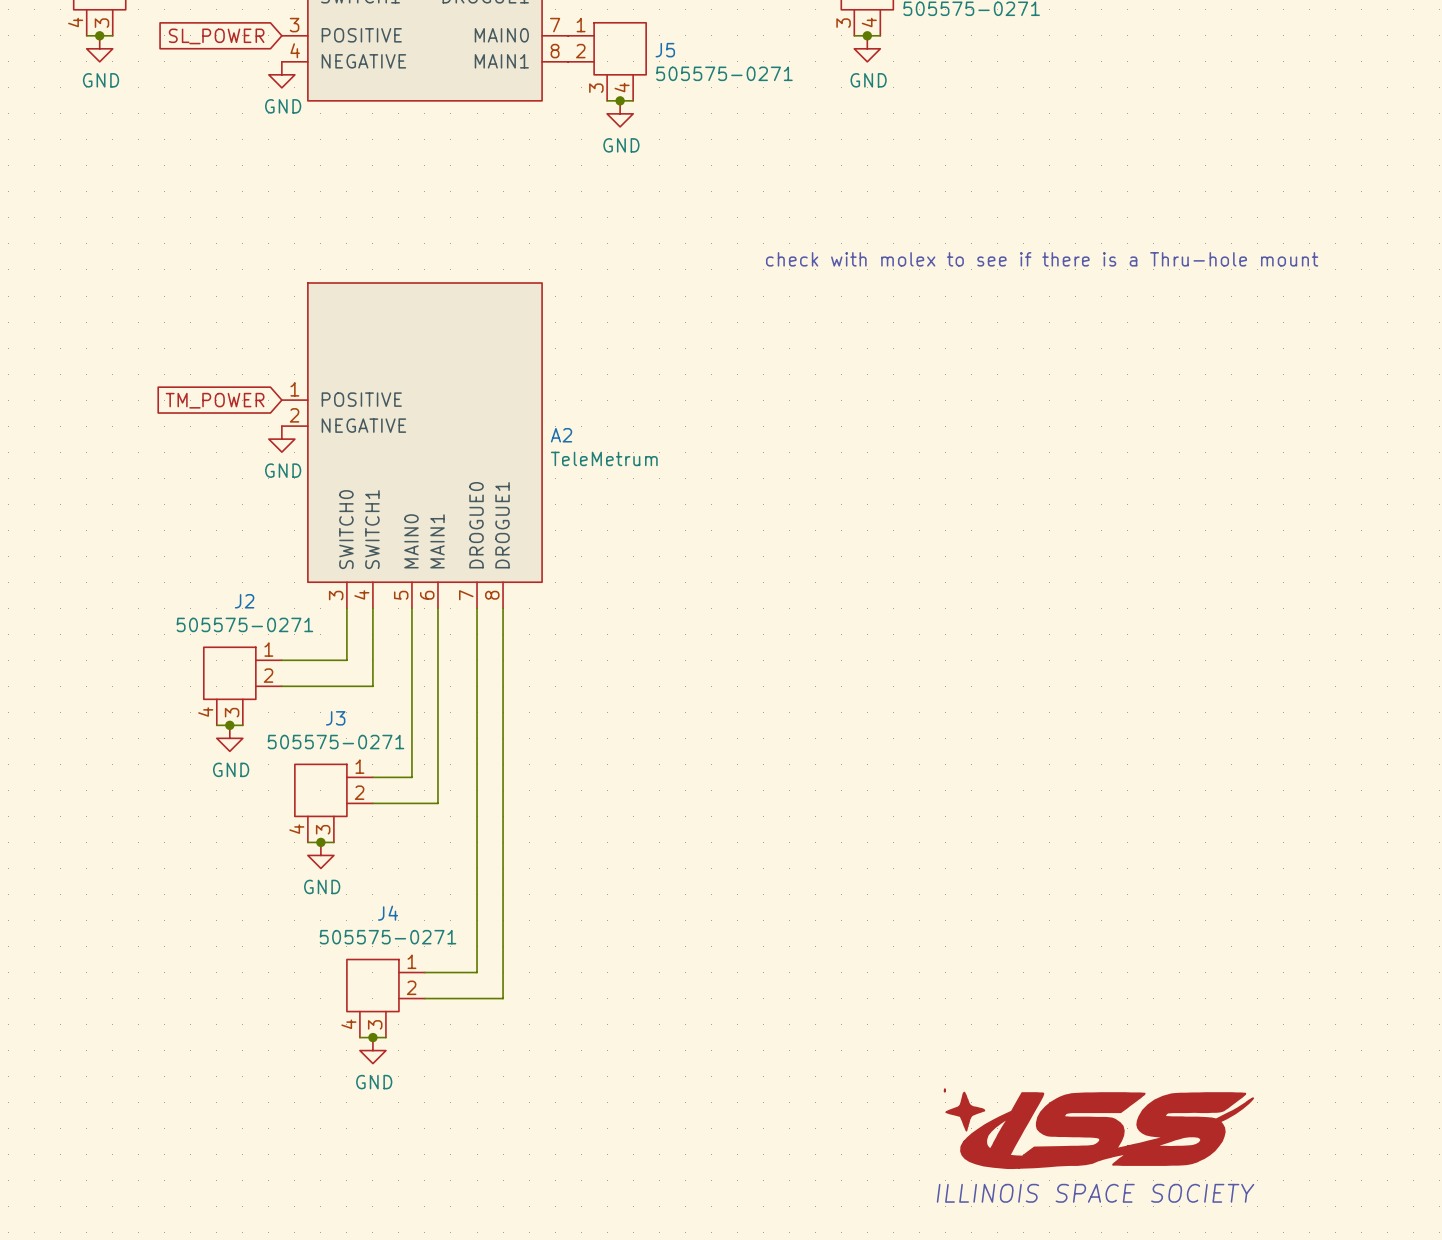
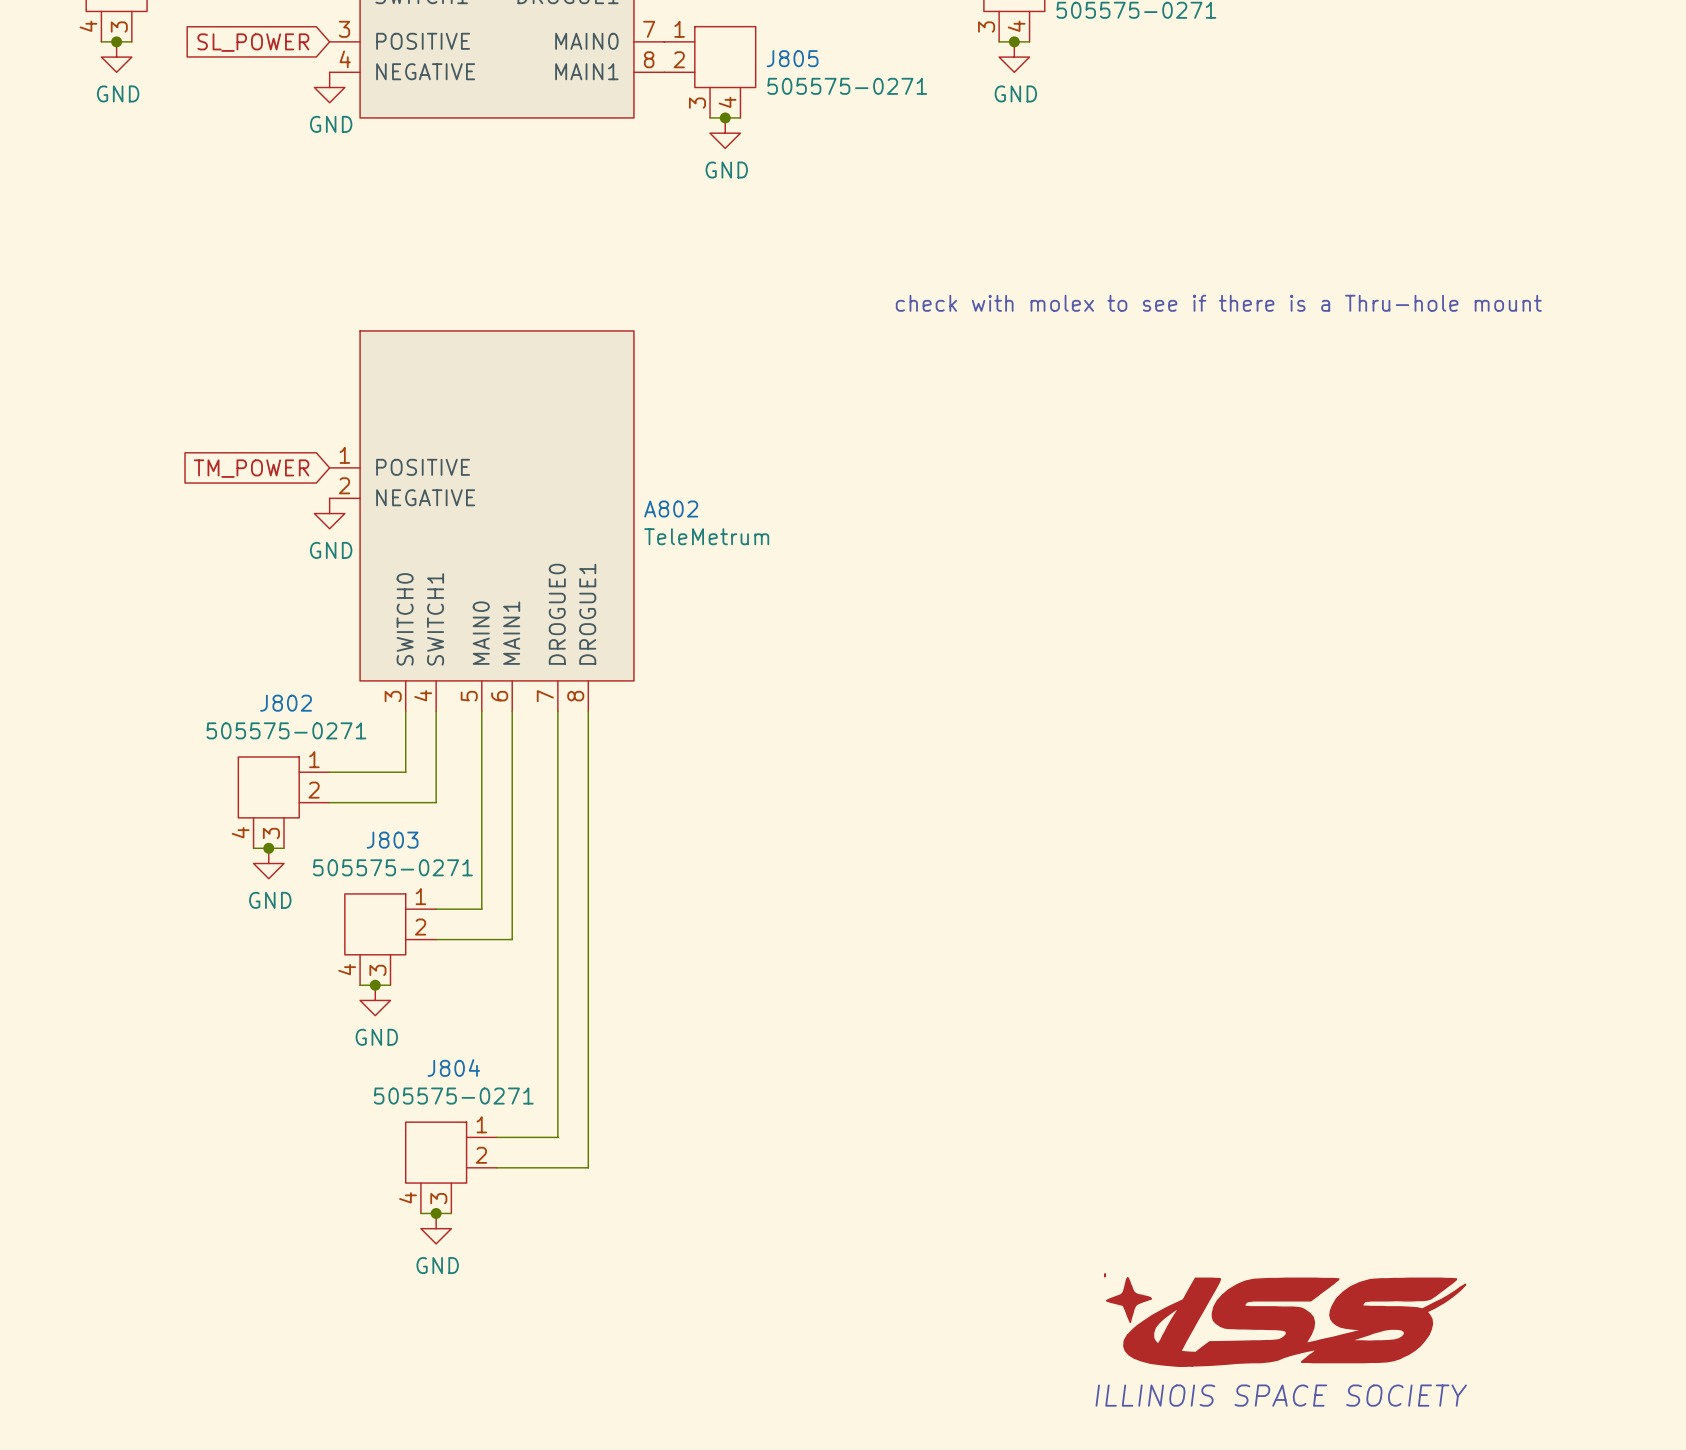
J5 name: J5 (665, 50) -> J805 (792, 58)
A2 name: A2 (561, 435) -> A802 (671, 509)
J2 name: J2 (244, 601) -> J802 (286, 703)
J3 name: J3 (335, 718) -> J803 (392, 840)
J4 name: J4 (388, 913) -> J804 (453, 1067)

